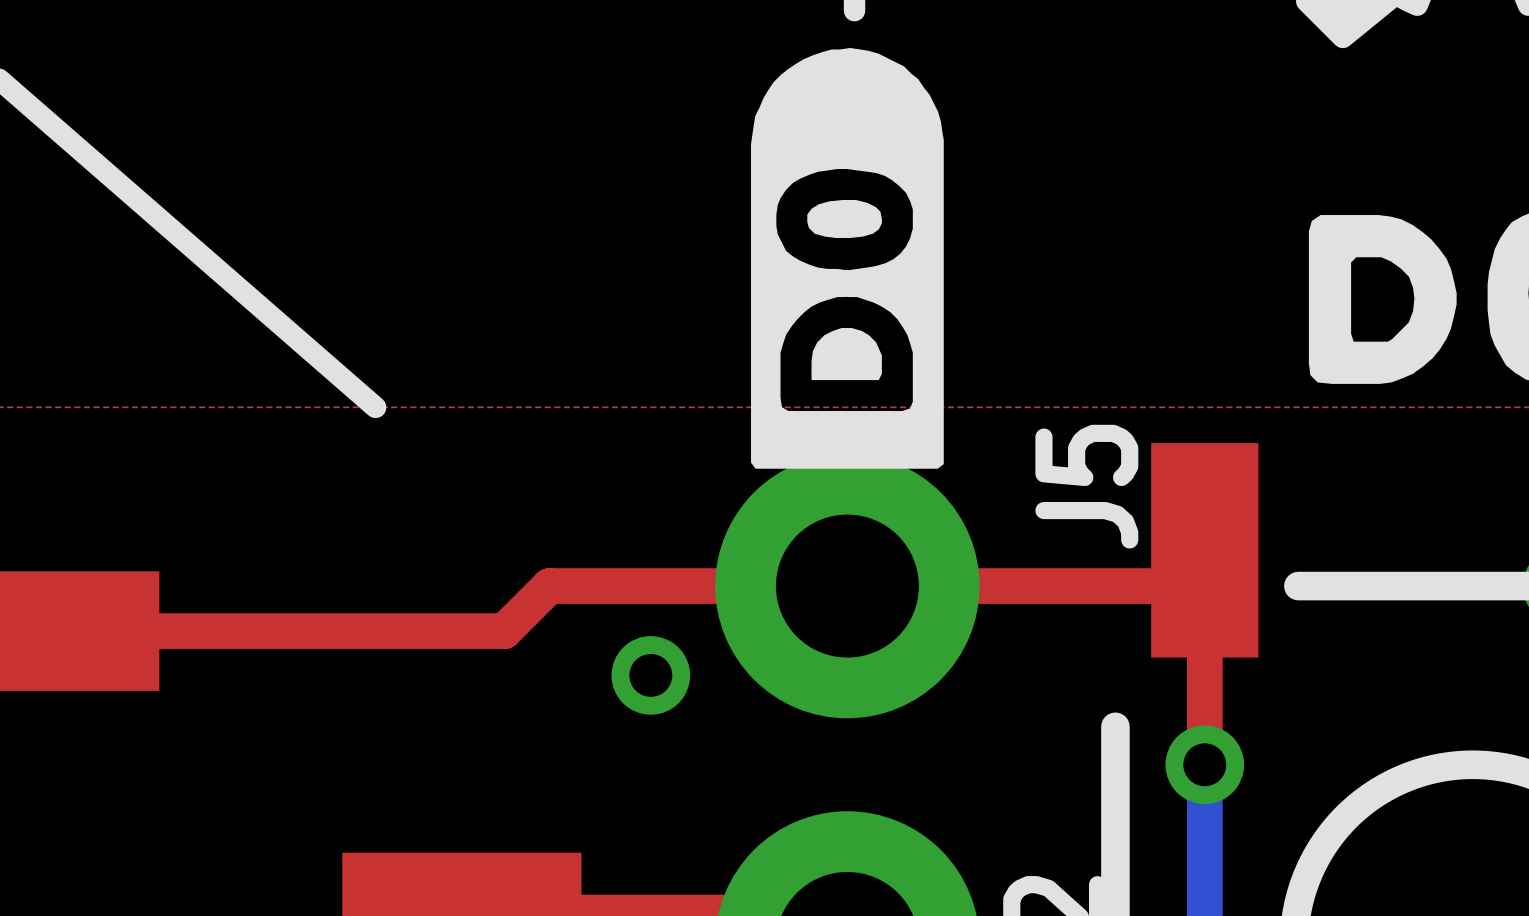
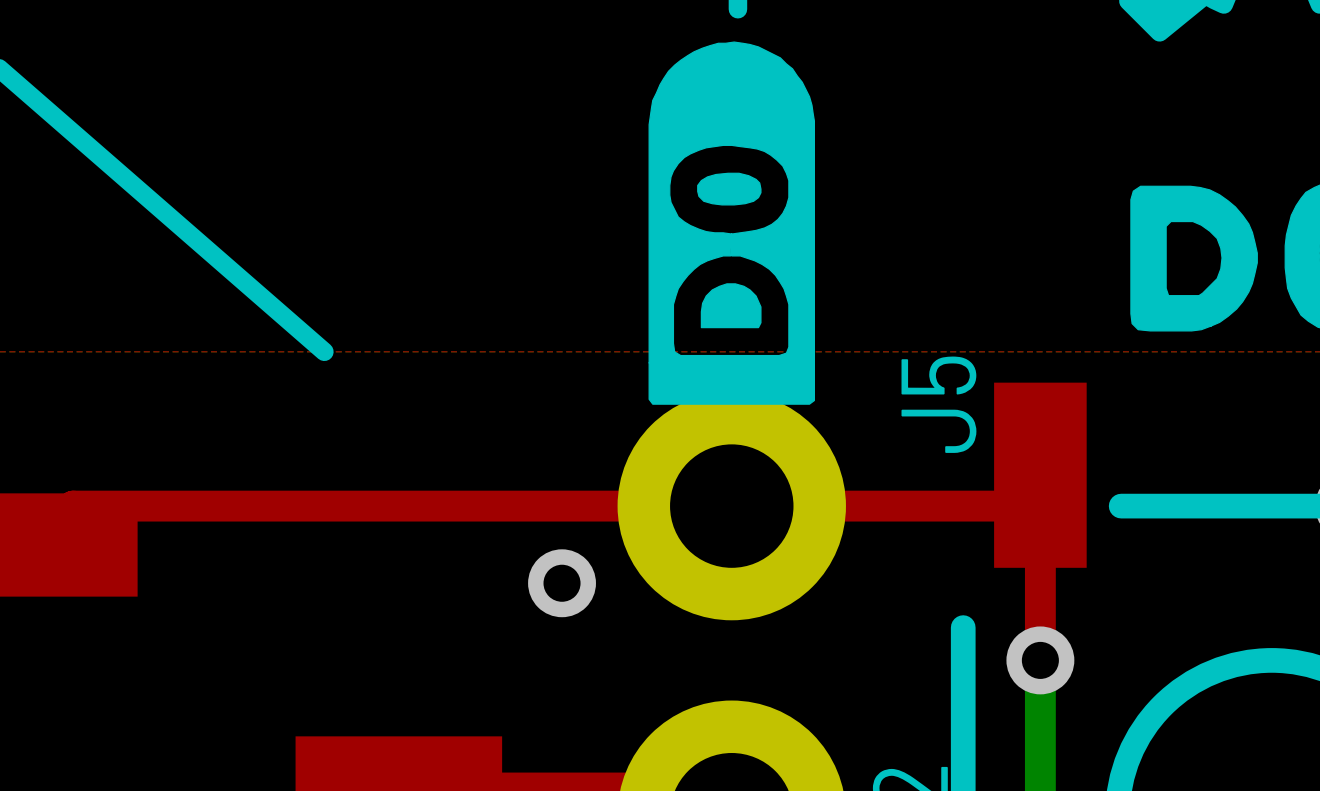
top track: (549, 586) (504, 631) (39, 631) -> (474, 506) (73, 506) (34, 544)

